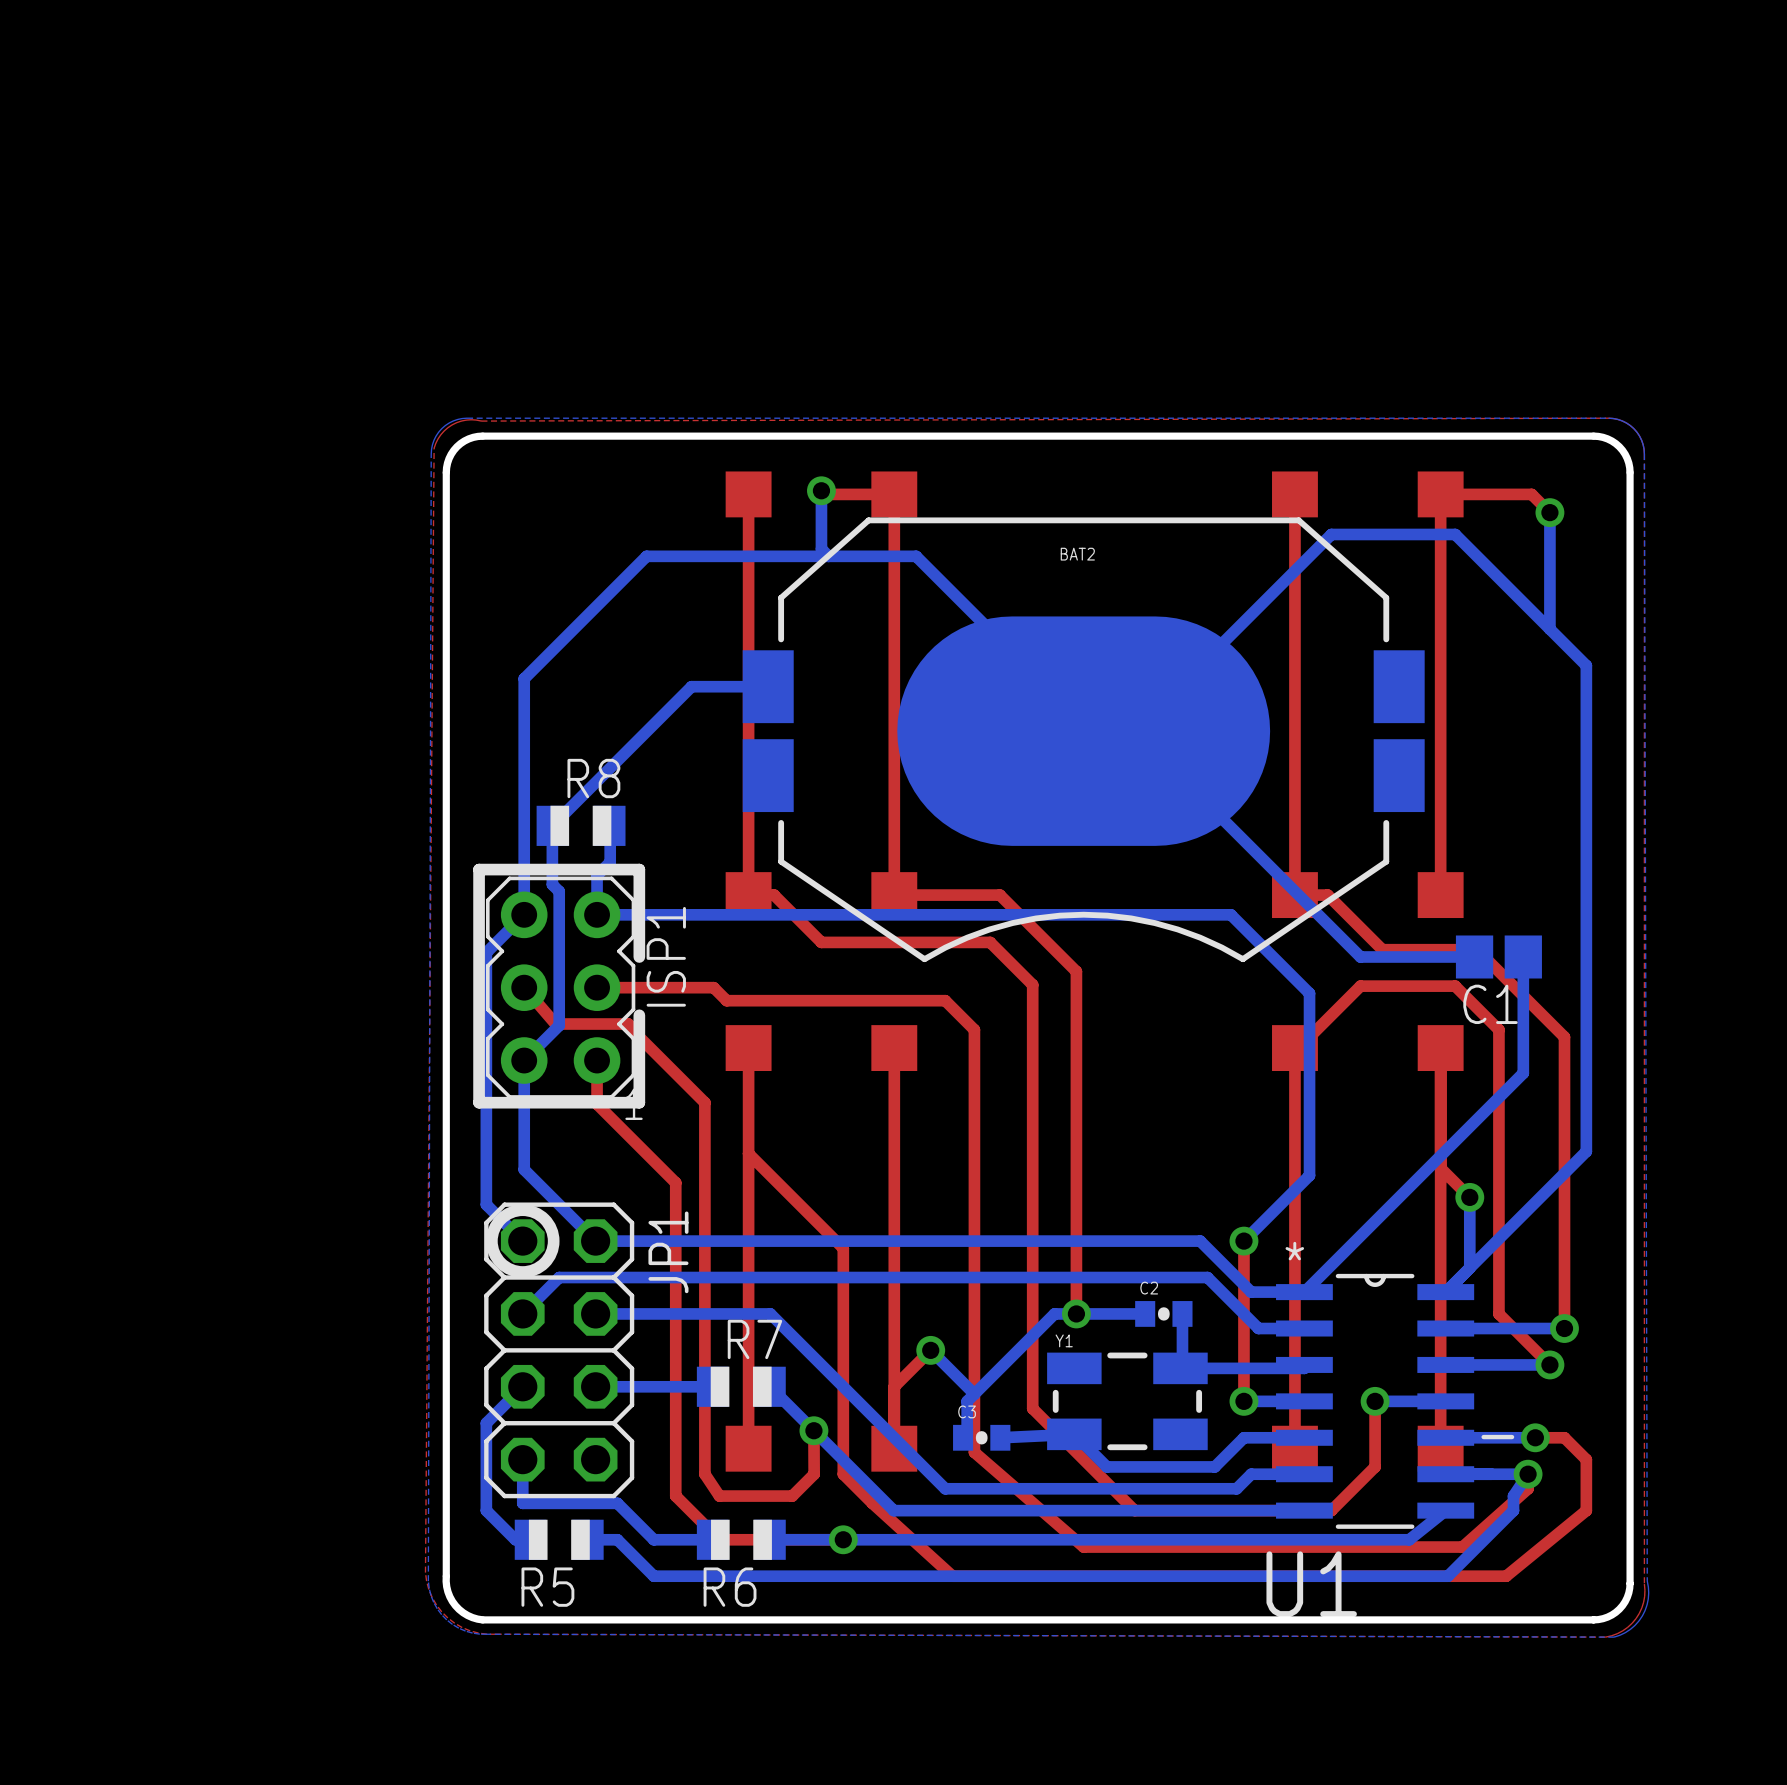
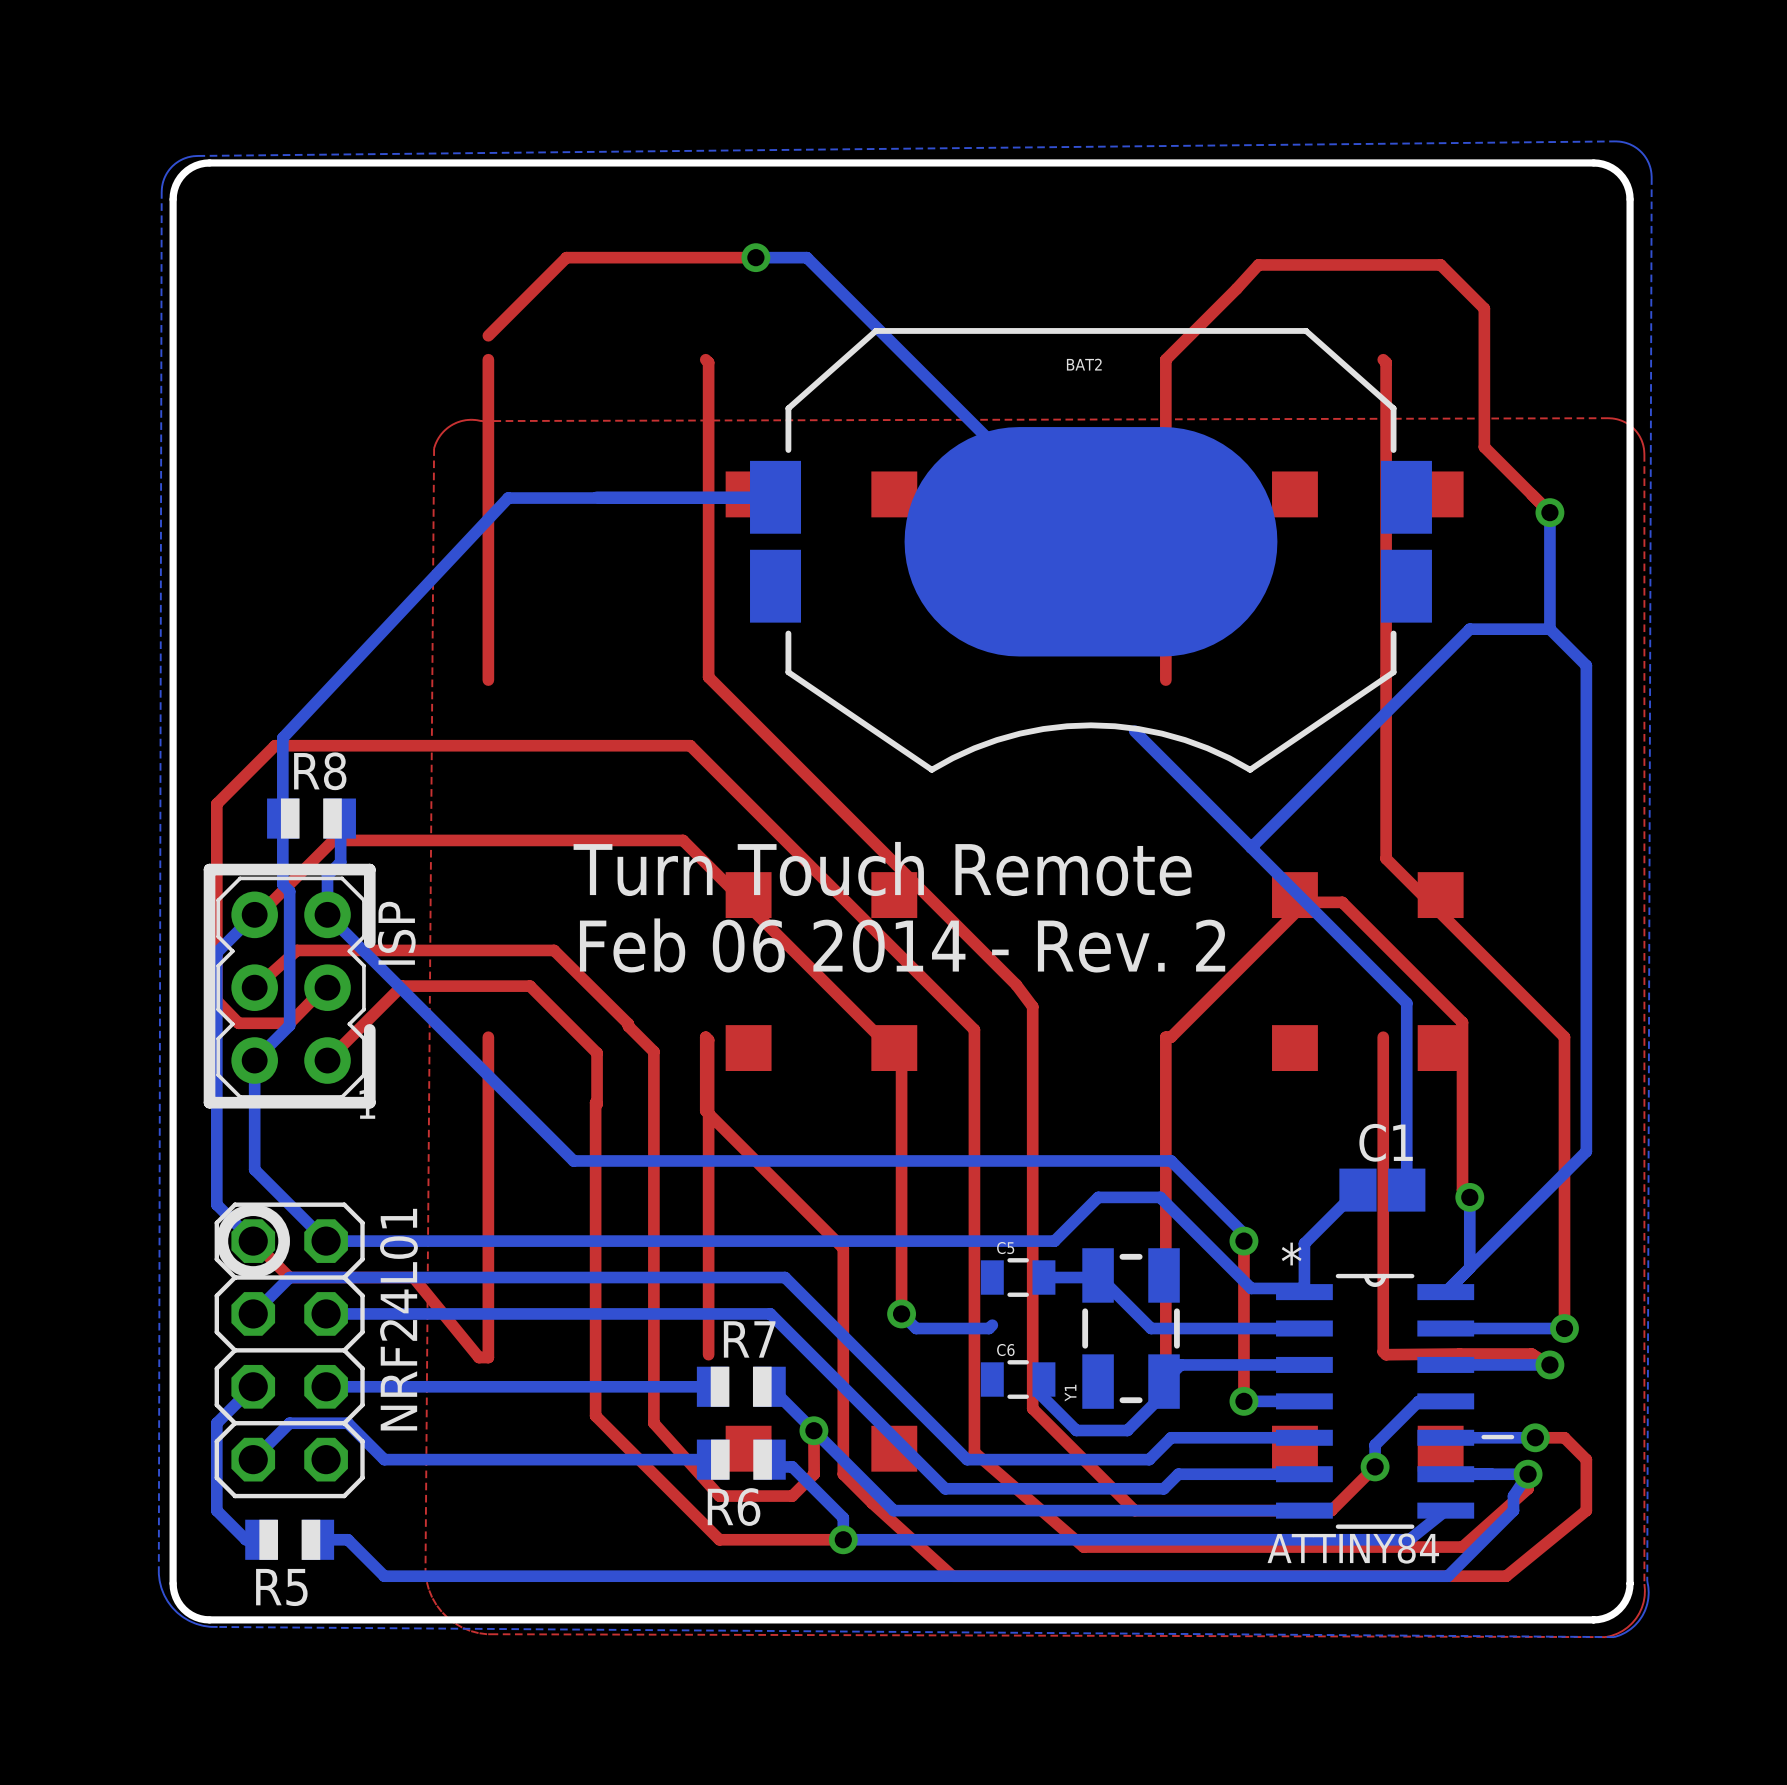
bottom track: none -> (755, 257) (806, 257) (1090, 541) (1083, 549) (916, 556)
via: none -> (755, 257)
top track: none -> (763, 257) (566, 257) (488, 335)
top track: none -> (488, 359) (488, 680)
board edge: (1630, 472) (1627, 458) (1619, 446) (1607, 438) (1593, 436) (482, 436) (468, 438) (456, 446) (449, 458) (446, 472) (446, 1581) (449, 1596) (459, 1609) (467, 1615) (482, 1619) -> (1630, 472) (1629, 194) (1622, 177) (1611, 167) (1603, 164) (209, 162) (195, 165) (183, 173) (175, 185) (173, 199) (174, 1592) (177, 1601) (187, 1612) (204, 1619) (482, 1619)
bottom track: (821, 490) (821, 549) (828, 556) -> none
top track: (821, 490) (821, 494) (894, 494) (894, 895) (999, 895) (1076, 971) (1076, 1313) -> none
via: (821, 490) -> none
top track: (748, 494) (748, 895) (774, 895) (821, 942) (990, 942) (1032, 984) (1032, 1006) -> (705, 359) (708, 362) (708, 677) (1016, 984) (1032, 1006)
top track: (1294, 494) (1294, 895) (1327, 895) (1382, 949) (1477, 949) -> (1383, 359) (1386, 362) (1386, 858) (1477, 949)
top track: (1531, 494) (1440, 494) (1440, 895) -> (1531, 494) (1484, 447) (1484, 308) (1440, 264) (1258, 264) (1165, 359) (1165, 680)
bottom track: (1549, 629) (1455, 534) (1331, 534) (1134, 731) (1083, 731) (1083, 723) (916, 556) (646, 556) (524, 678) (524, 914) (486, 952) (486, 1204) (522, 1241) -> (1549, 629) (1469, 629) (1251, 847)
bottom track: (768, 686) (691, 686) (552, 825) (552, 884) (559, 891) (559, 1025) (524, 1060) (524, 1169) (595, 1241) -> (596, 497) (775, 497) (508, 498) (282, 737) (282, 884) (289, 891) (289, 1025) (254, 1060) (254, 1169) (326, 1241) (595, 1241)
BAT2 position: (1083, 739) -> (1090, 550)
R8 position: (581, 825) -> (311, 818)
bottom track: (609, 825) (610, 862) (597, 875) (597, 914) (1230, 914) (1309, 993) (1309, 1175) (1243, 1241) -> (340, 818) (340, 862) (327, 875) (327, 914) (573, 1160) (1171, 1160) (1243, 1233) (1243, 1241)
text: none -> Turn Touch Remote (882, 868)
bottom track: none -> (254, 914) (216, 952) (216, 1204) (253, 1241)
top track: none -> (254, 914) (258, 914) (333, 840) (683, 840) (901, 1058) (901, 1313)
line: none -> (369, 942) (369, 869) (209, 869) (209, 1102) (369, 1102) (369, 1029)
text: none -> Feb 06 2014 - Rev. 2 (902, 945)
line: (639, 956) (639, 869) (479, 869) (479, 1102) (639, 1102) (639, 1015) -> none
bottom track: (1474, 956) (1360, 956) -> (1406, 1190) (1406, 1003) (1360, 956)
C1 position: (1498, 956) -> (1382, 1190)
bottom track: (1523, 956) (1523, 1073) (1304, 1292) (1251, 1292) (1200, 1241) (1054, 1241) -> (1358, 1190) (1304, 1243) (1304, 1292) (1300, 1288) (1251, 1288) (1160, 1197) (1098, 1197) (1054, 1241)
ISP: none -> (291, 987)
top track: (524, 987) (555, 1024) (628, 1024) -> (254, 987) (296, 950) (554, 950) (628, 1024)
ISP1: (560, 987) -> none
top track: (597, 987) (713, 987) (726, 1000) (945, 1000) -> (327, 987) (324, 987) (289, 1023) (238, 1023) (216, 1000) (216, 804) (275, 745) (690, 745) (945, 1000)
C1 name position: C1 (1490, 1004) -> C1 (1386, 1142)
top track: none -> (488, 1037) (488, 1357) (478, 1357) (413, 1277) (289, 1277) (253, 1241)
top track: (748, 1048) (748, 1448) -> none
top track: (894, 1048) (894, 1448) -> none
top track: (1294, 1048) (1294, 1448) -> none
top track: (1440, 1048) (1440, 1448) -> none
top track: (653, 1051) (704, 1102) (704, 1474) (719, 1496) -> (653, 1051) (653, 1423) (719, 1496)
top track: (1294, 1051) (1360, 986) (1455, 986) (1498, 1029) (1498, 1313) (1549, 1364) -> (1383, 1037) (1383, 1351) (1386, 1354) (1531, 1354) (1549, 1364)
top track: none -> (597, 1060) (597, 1053) (530, 986) (401, 986) (327, 1060)
top track: (597, 1104) (675, 1182) (675, 1496) -> (597, 1104) (595, 1102) (595, 1415) (675, 1496)
top track: none -> (748, 1153) (705, 1110) (705, 1037) (708, 1040) (708, 1354)
top track: (1440, 1168) (1462, 1190) -> (1165, 1357) (1165, 1037) (1171, 1037) (1305, 902) (1342, 902) (1462, 1022) (1462, 1190)
drawing position: (522, 1241) -> (253, 1241)
bottom track: (559, 1277) (522, 1313) -> (559, 1277) (289, 1277) (253, 1313)
C5: none -> (1018, 1277)
bottom track: (1043, 1277) (785, 1277) -> (1243, 1437) (1171, 1437) (1149, 1459) (967, 1459) (785, 1277)
bottom track: (1096, 1277) (1207, 1277) (1258, 1328) -> (1096, 1277) (1098, 1275) (1151, 1328) (1258, 1328)
bottom track: none -> (595, 1313) (326, 1313)
bottom track: none -> (901, 1313) (916, 1328) (989, 1328) (992, 1325)
via: (1076, 1313) -> none
bottom track: (1145, 1313) (1054, 1313) (967, 1401) (967, 1433) (963, 1437) -> none
C2: (1163, 1313) -> none
bottom track: (1182, 1313) (1182, 1366) (1180, 1368) (1304, 1368) (1304, 1364) -> (1043, 1379) (1039, 1383) (1039, 1394) (1076, 1430) (1127, 1430) (1164, 1393) (1164, 1381) (1180, 1364) (1304, 1364)
Y1 name position: Y1 (1064, 1340) -> Y1 (1070, 1393)
NRF24L01: none -> (289, 1350)
JP1: (559, 1350) -> none
bottom track: (930, 1350) (974, 1394) -> none
top track: (930, 1350) (894, 1386) -> none
via position: (930, 1350) -> (901, 1313)
C6: none -> (1018, 1379)
bottom track: (522, 1386) (486, 1423) (486, 1510) (515, 1539) (530, 1539) -> (253, 1386) (216, 1423) (216, 1510) (245, 1539) (260, 1539)
bottom track: none -> (595, 1386) (326, 1386)
Y1 rotation: 0° (1127, 1401) -> 90° clockwise (1131, 1328)
top track: (1375, 1401) (1375, 1466) -> none
via position: (1375, 1401) -> (1375, 1466)
bottom track: (1418, 1401) (1375, 1401) -> (1418, 1401) (1375, 1445) (1375, 1466)
C3: (981, 1437) -> none
bottom track: (1243, 1437) (1214, 1466) (1106, 1466) (1074, 1434) (1000, 1437) -> none
bottom track: (522, 1459) (522, 1503) (617, 1503) (653, 1539) (712, 1539) -> none
bottom track: none -> (712, 1459) (384, 1459) (347, 1423) (289, 1423) (253, 1459)
bottom track: (1251, 1474) (1236, 1488) (1163, 1488) -> (1251, 1474) (1178, 1474) (1163, 1488)
R5 position: (559, 1539) -> (289, 1539)
bottom track: (587, 1539) (617, 1539) (653, 1576) -> (318, 1539) (347, 1539) (384, 1576) (653, 1576)
R6 position: (741, 1539) -> (741, 1459)
bottom track: (843, 1539) (770, 1539) -> (843, 1539) (843, 1517) (792, 1466) (777, 1466) (770, 1459)
bottom zone outline: (1647, 1581) (1644, 454) (1641, 440) (1633, 428) (1622, 420) (1608, 418) (467, 418) (453, 420) (441, 428) (433, 440) (431, 454) (428, 1581) (431, 1595) (441, 1614) (458, 1628) (479, 1634) (1614, 1637) -> (1647, 1581) (1651, 177) (1648, 163) (1641, 151) (1629, 144) (1615, 141) (197, 155) (183, 158) (172, 166) (164, 178) (161, 191) (158, 1573) (164, 1595) (177, 1612) (189, 1620) (210, 1626) (1614, 1637)
U1 name: U1 (1311, 1584) -> ATTINY84 (1353, 1548)

